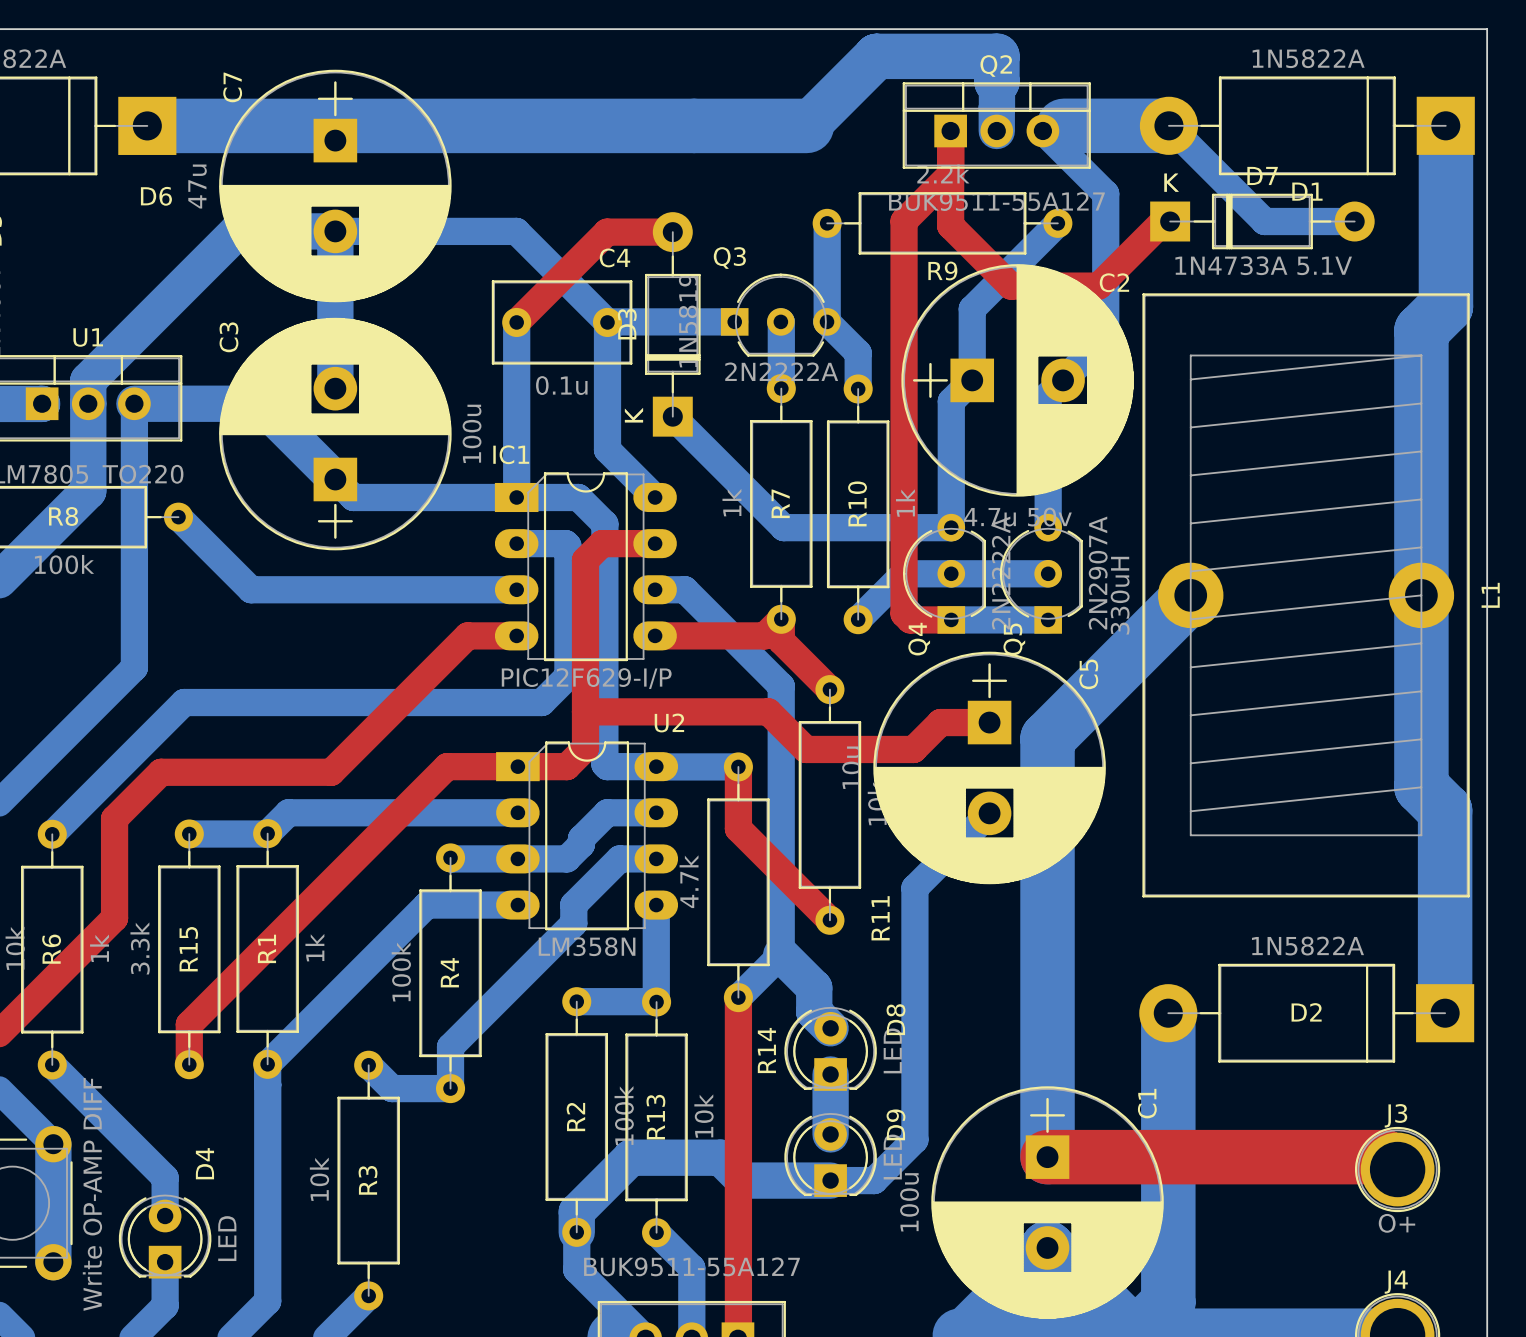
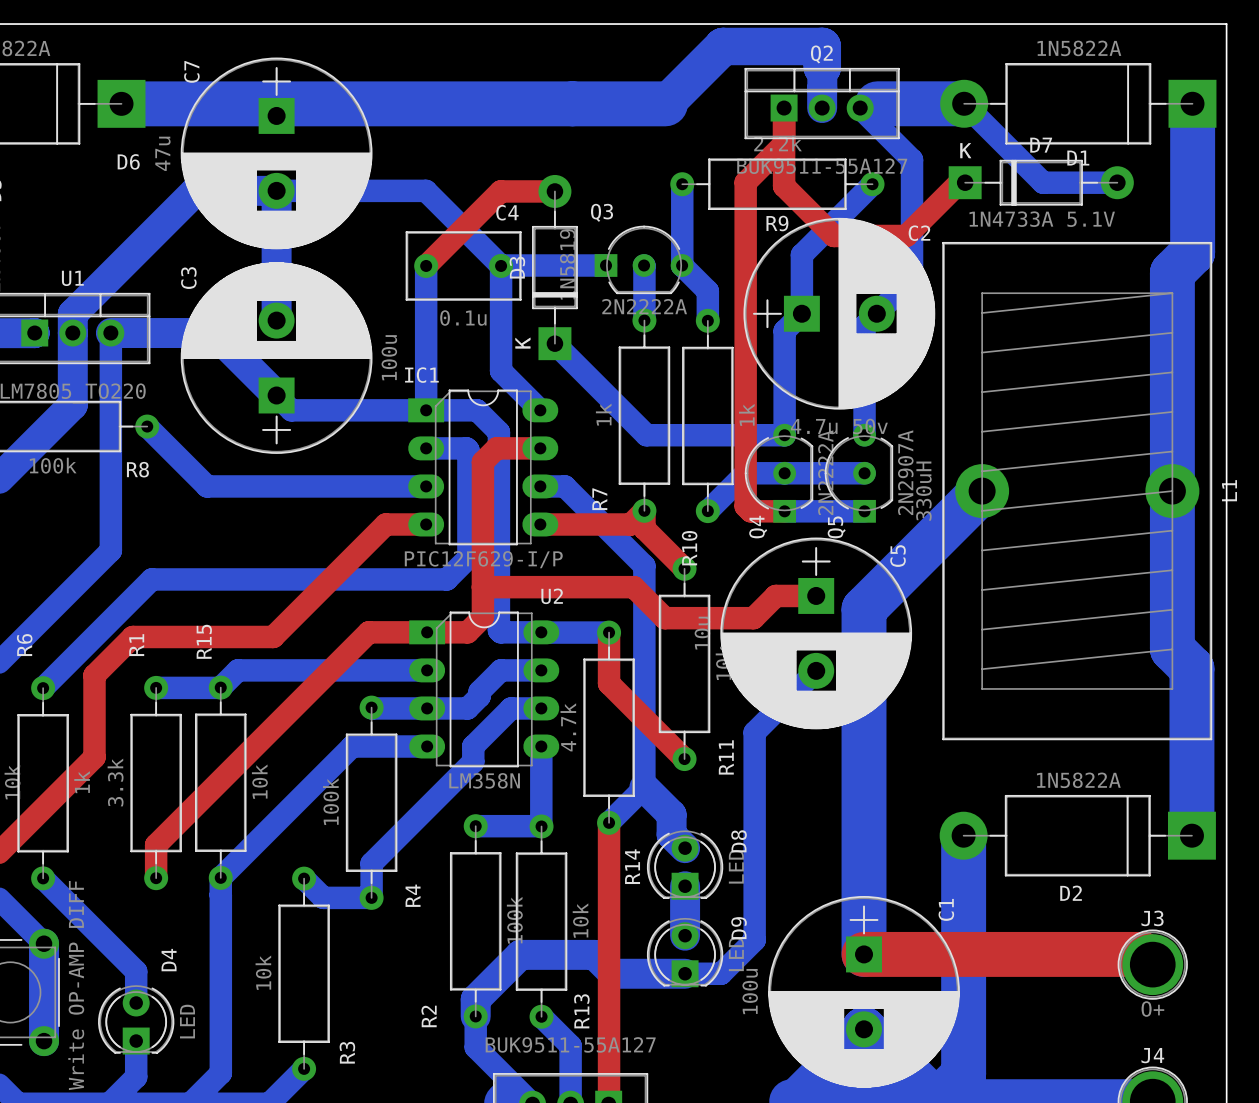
R7 name position: R7 (780, 503) -> R7 (599, 499)
R10 name position: R10 (857, 503) -> R10 (689, 548)
R8 name position: R8 (63, 516) -> R8 (137, 469)
R1 value: 1k (314, 947) -> 10k (259, 781)
R1 name position: R1 (266, 948) -> R1 (136, 645)
R6 name position: R6 (51, 949) -> R6 (24, 645)
R15 name position: R15 (188, 949) -> R15 (204, 641)
R4 name position: R4 (449, 972) -> R4 (413, 895)
D2 name position: D2 (1306, 1012) -> D2 (1071, 893)
R2 name position: R2 (575, 1117) -> R2 (429, 1016)
R13 name position: R13 (655, 1117) -> R13 (581, 1011)
R3 name position: R3 (368, 1180) -> R3 (347, 1052)

